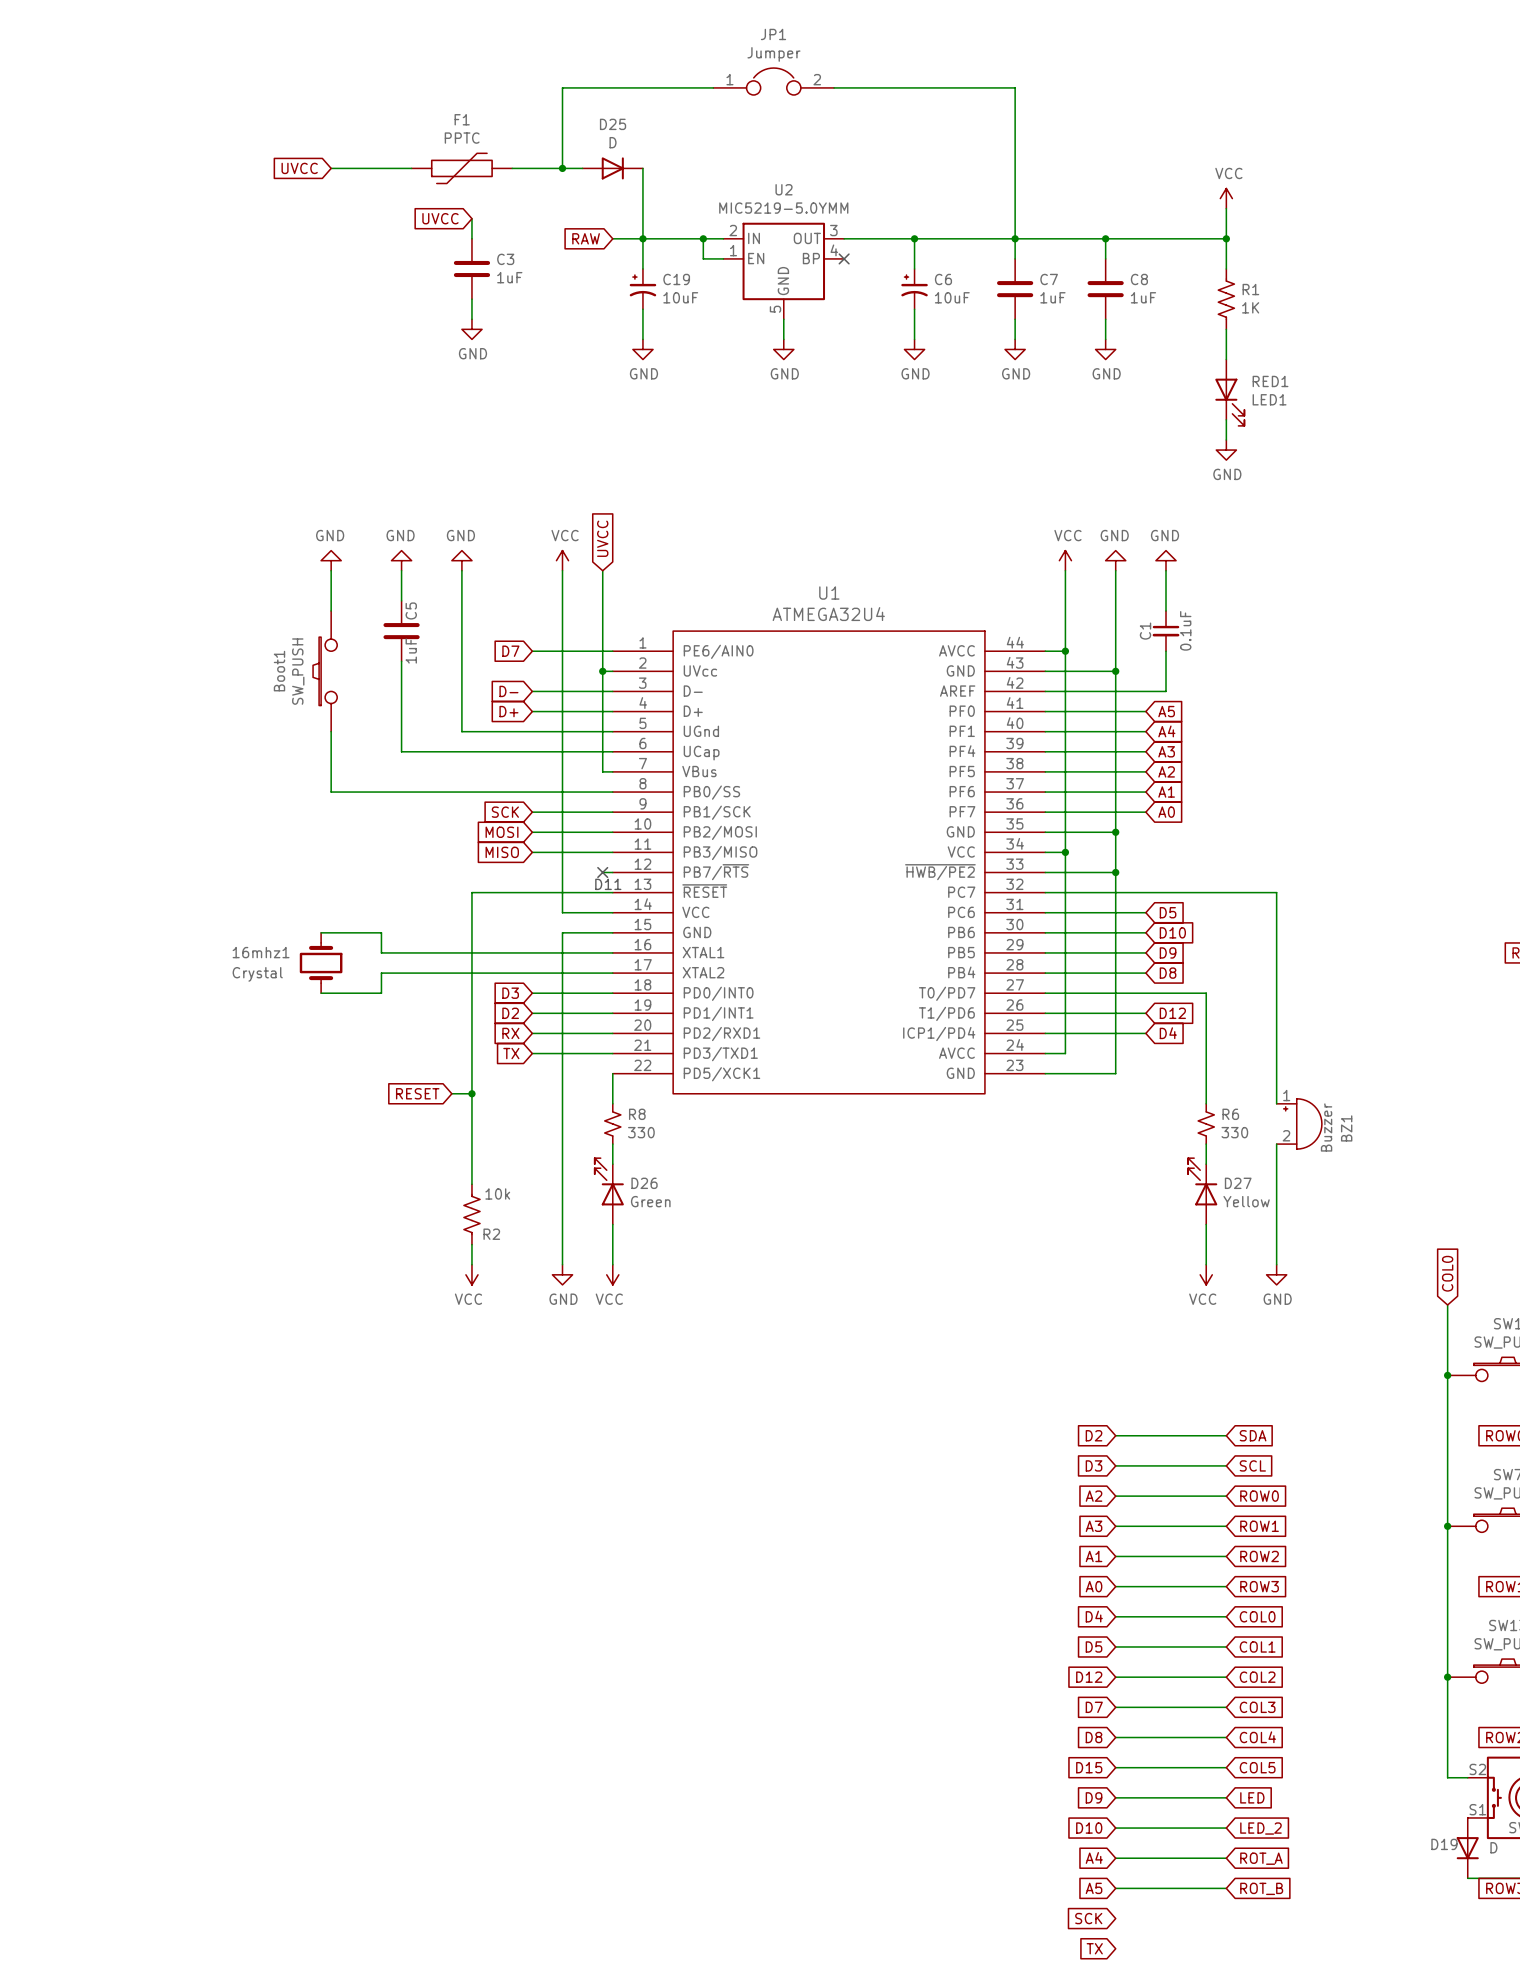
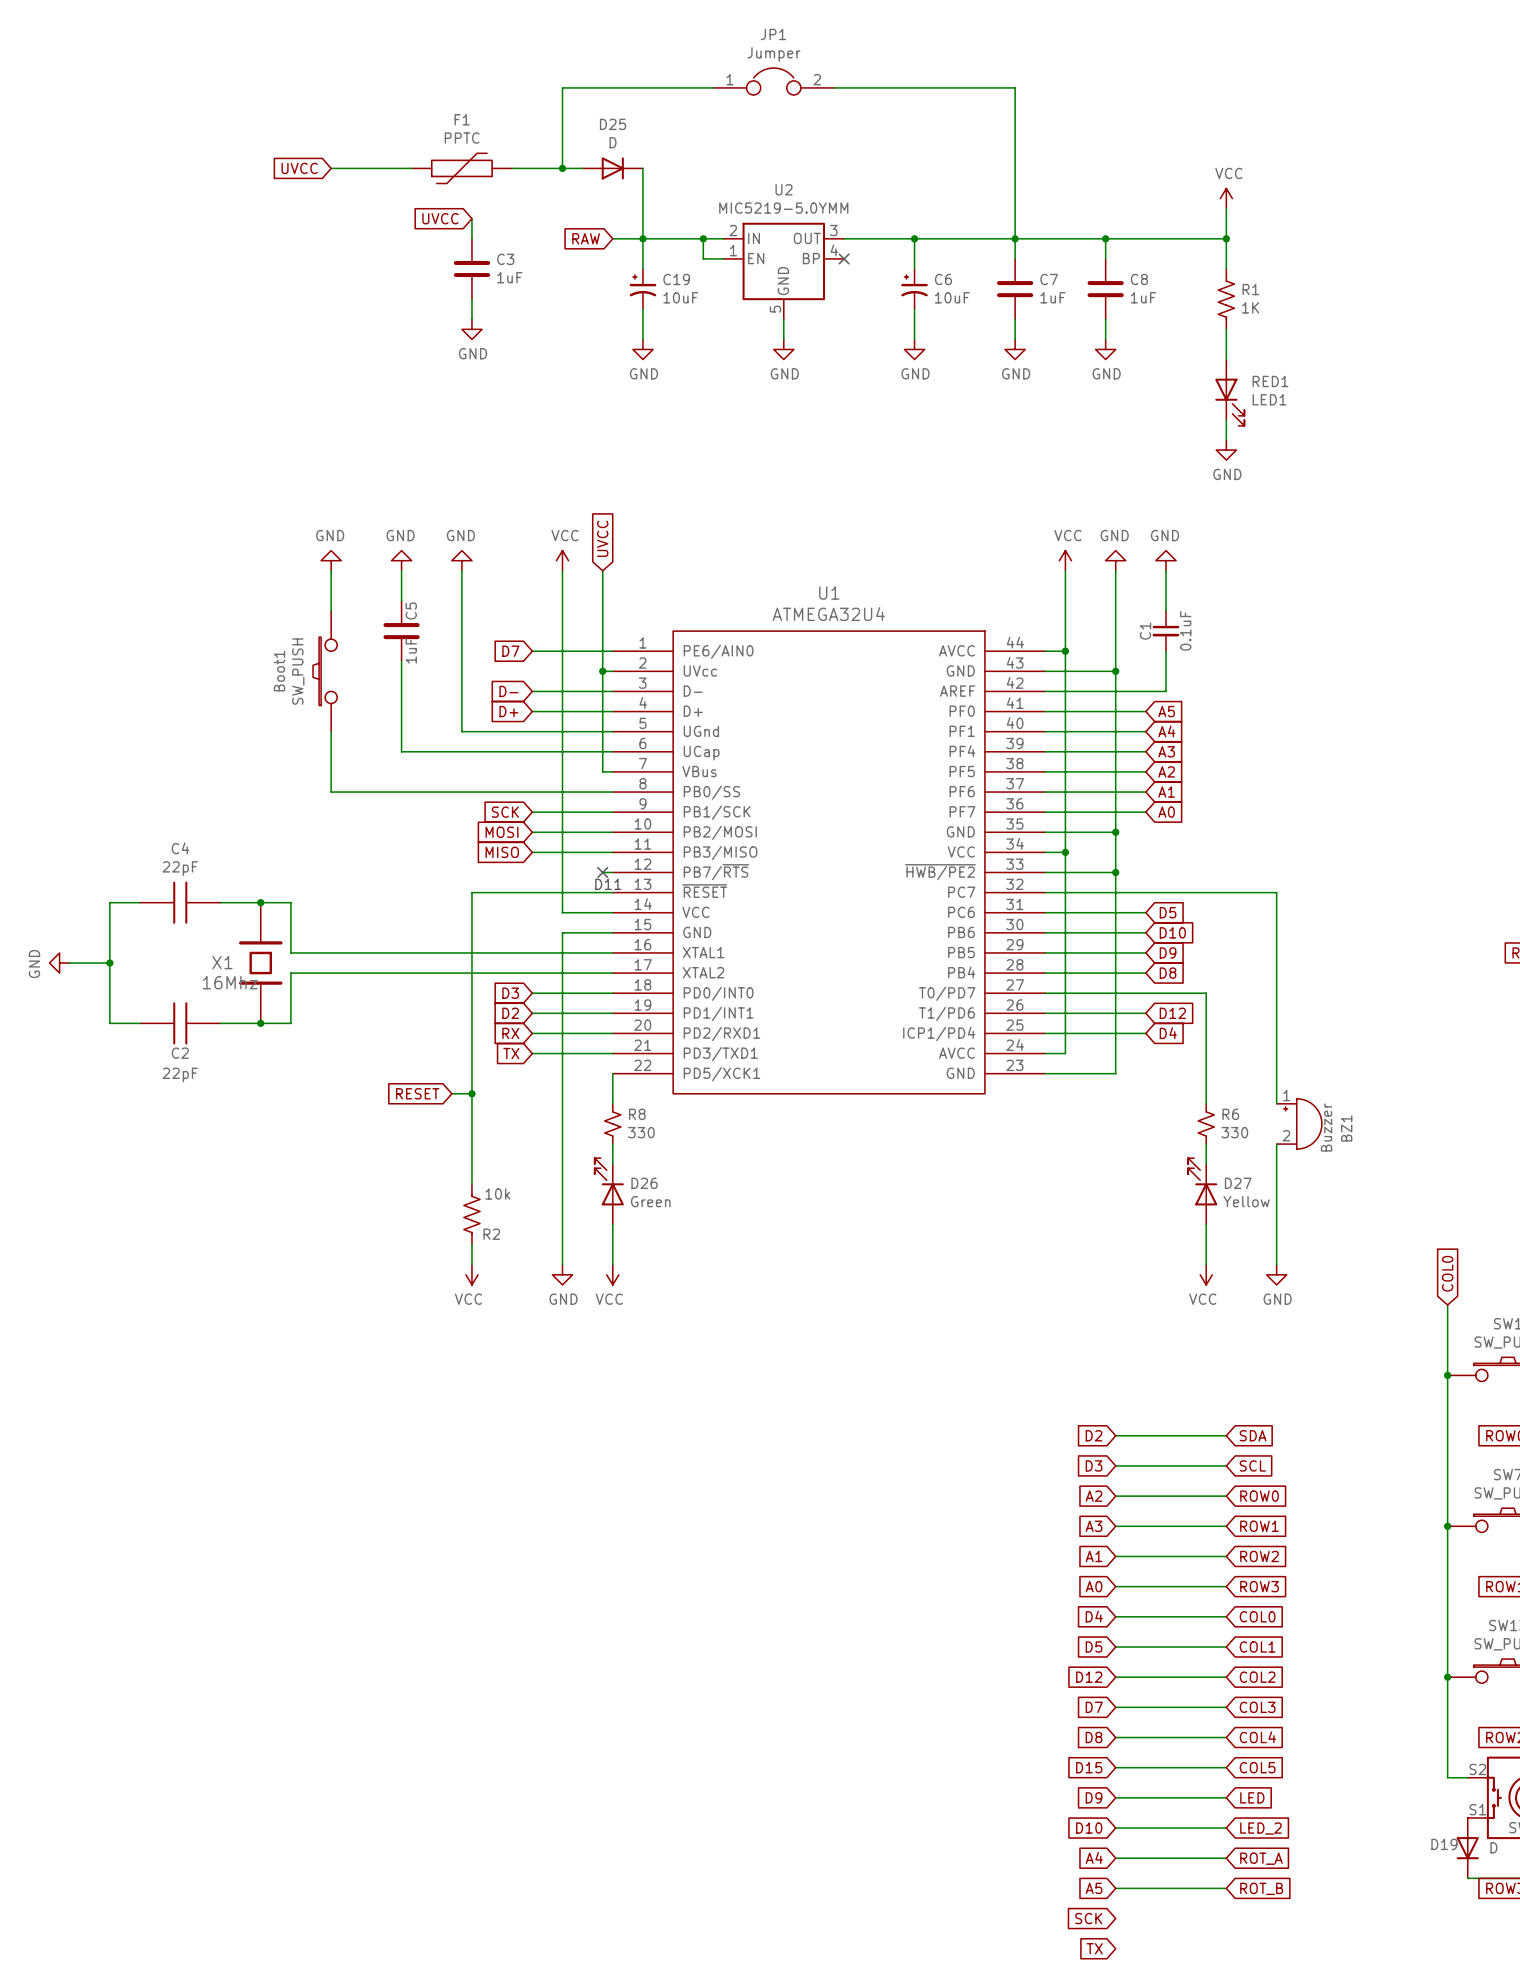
wire: none -> (140, 902) (109, 902) (109, 1023) (140, 1023)
C4: none -> 22pF (180, 902)
junction: none -> (260, 902)
wire: (321, 932) (381, 932) (381, 952) -> (220, 902) (290, 902) (290, 952) (381, 952)
power symbol: none -> GND (59, 963)
wire: none -> (69, 963) (109, 963)
junction: none -> (109, 963)
X1: none -> 16Mhz (260, 963)
16mhz1: Crystal (321, 963) -> none
wire: (381, 973) (381, 993) (321, 993) -> (381, 973) (290, 973) (290, 1023) (220, 1023)
C2: none -> 22pF (180, 1023)
junction: none -> (260, 1023)

